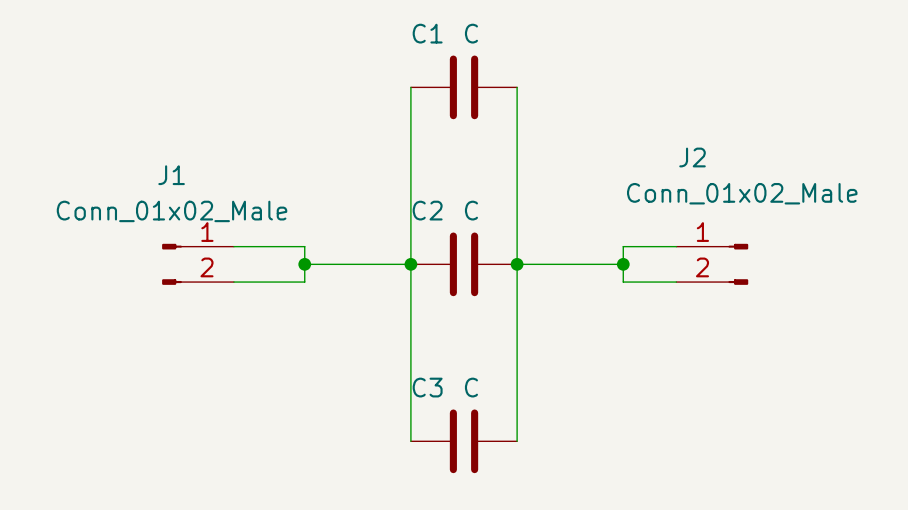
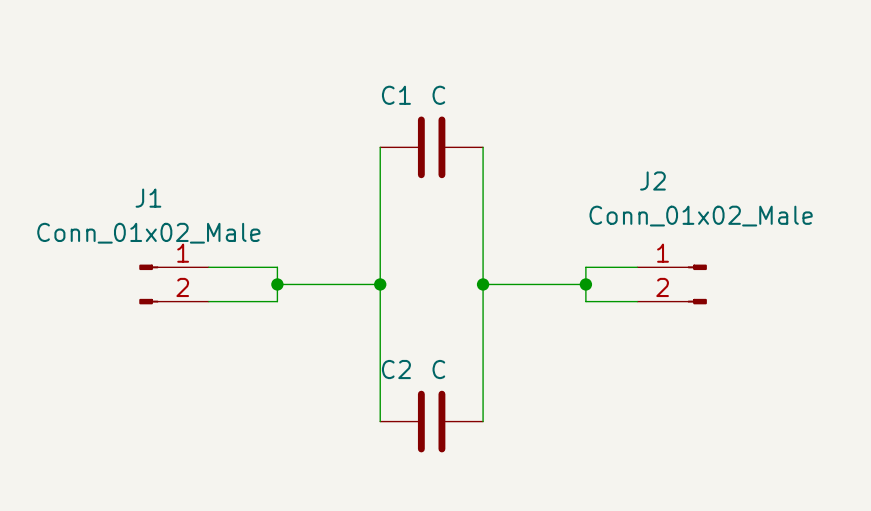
wire: (410, 87) (410, 122) -> none
C1 position: (464, 87) -> (431, 147)
wire: (517, 87) (517, 122) -> none
C2 position: (464, 264) -> (431, 421)
wire: (410, 405) (410, 441) -> none
wire: (517, 405) (517, 441) -> none
C3: C (464, 441) -> none

